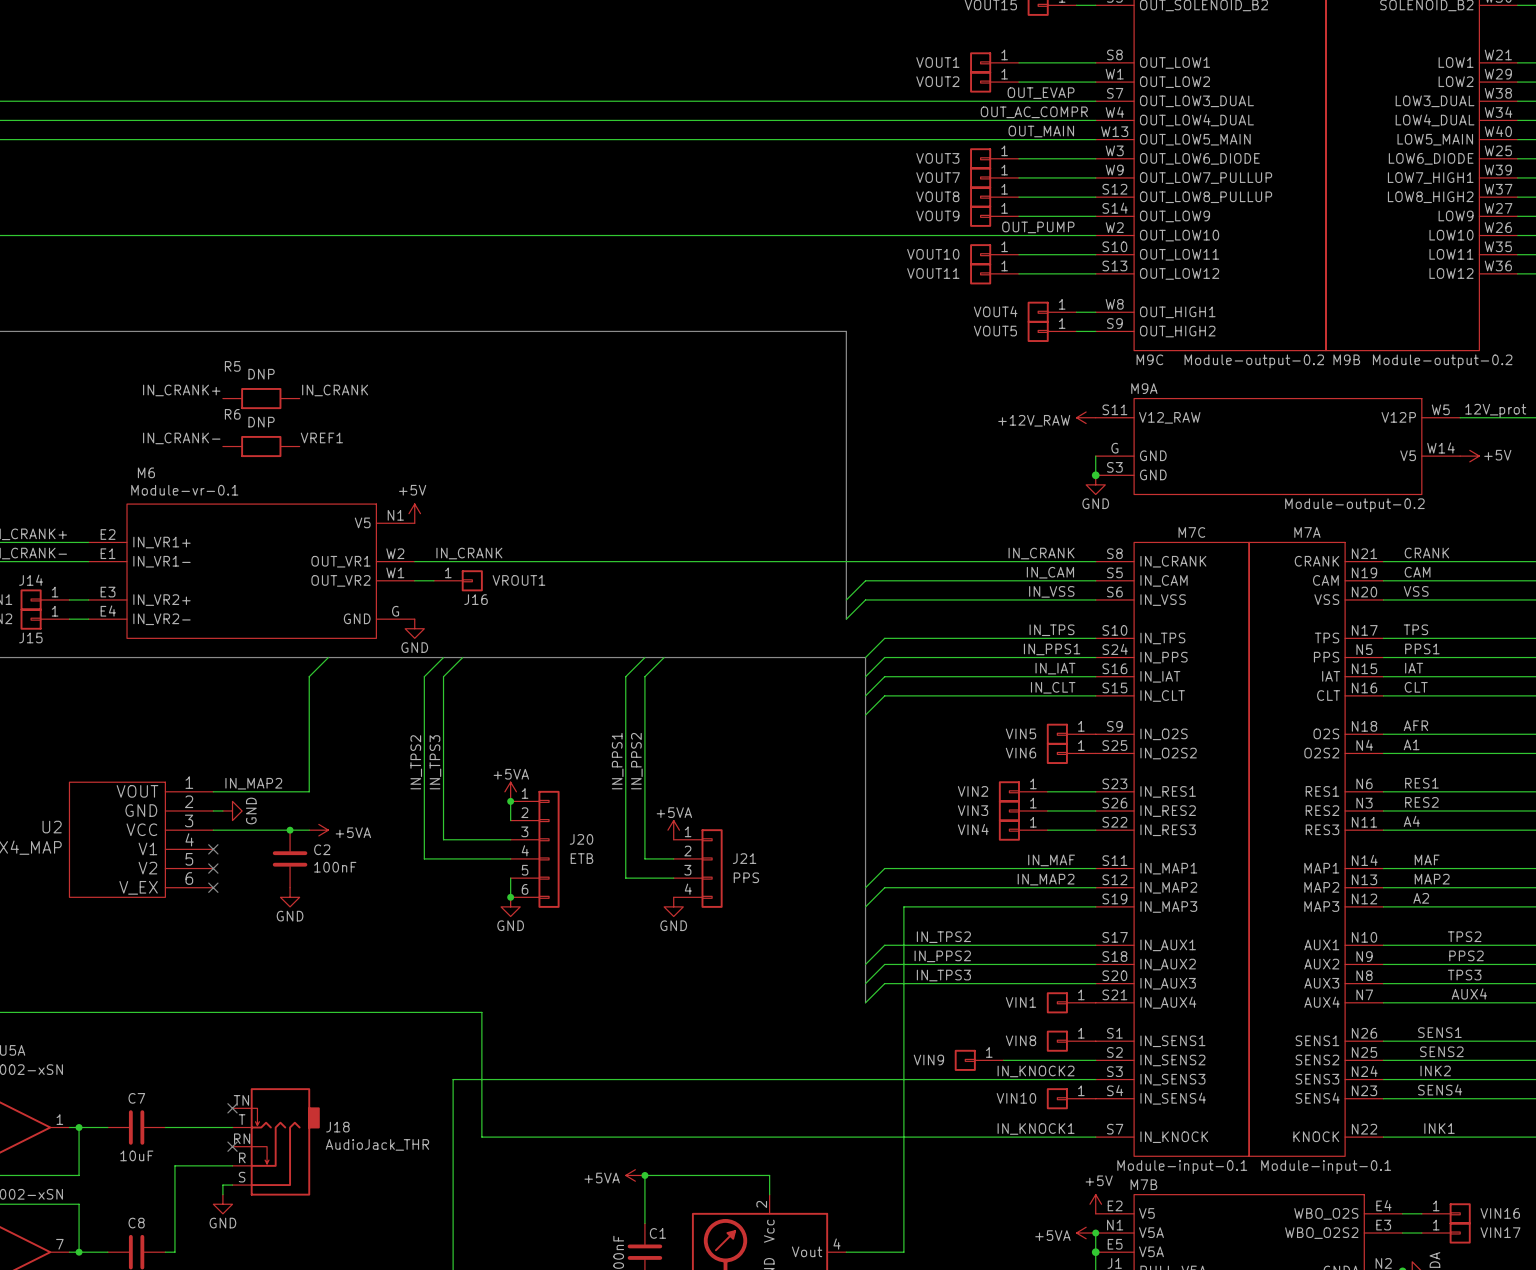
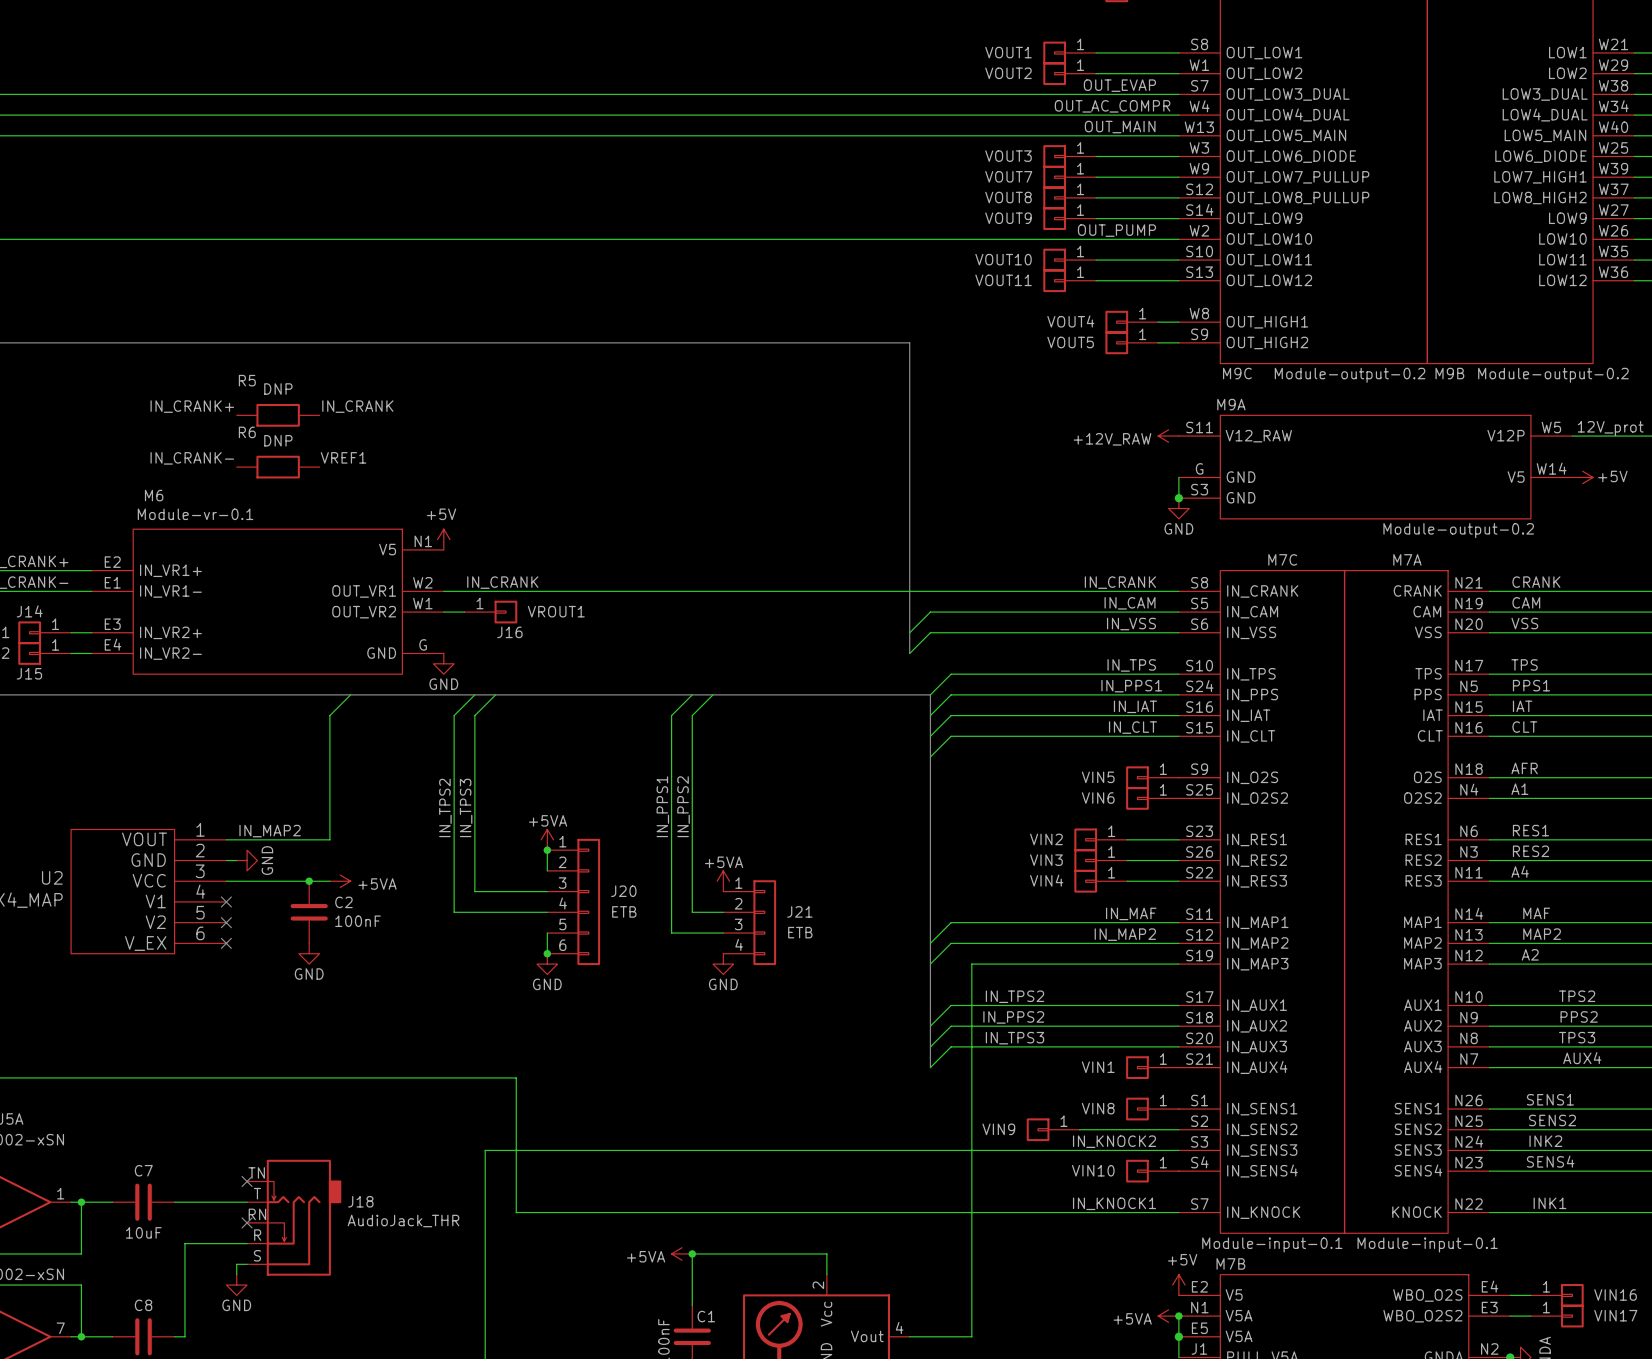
J21 value: PPS (746, 877) -> ETB (800, 932)

